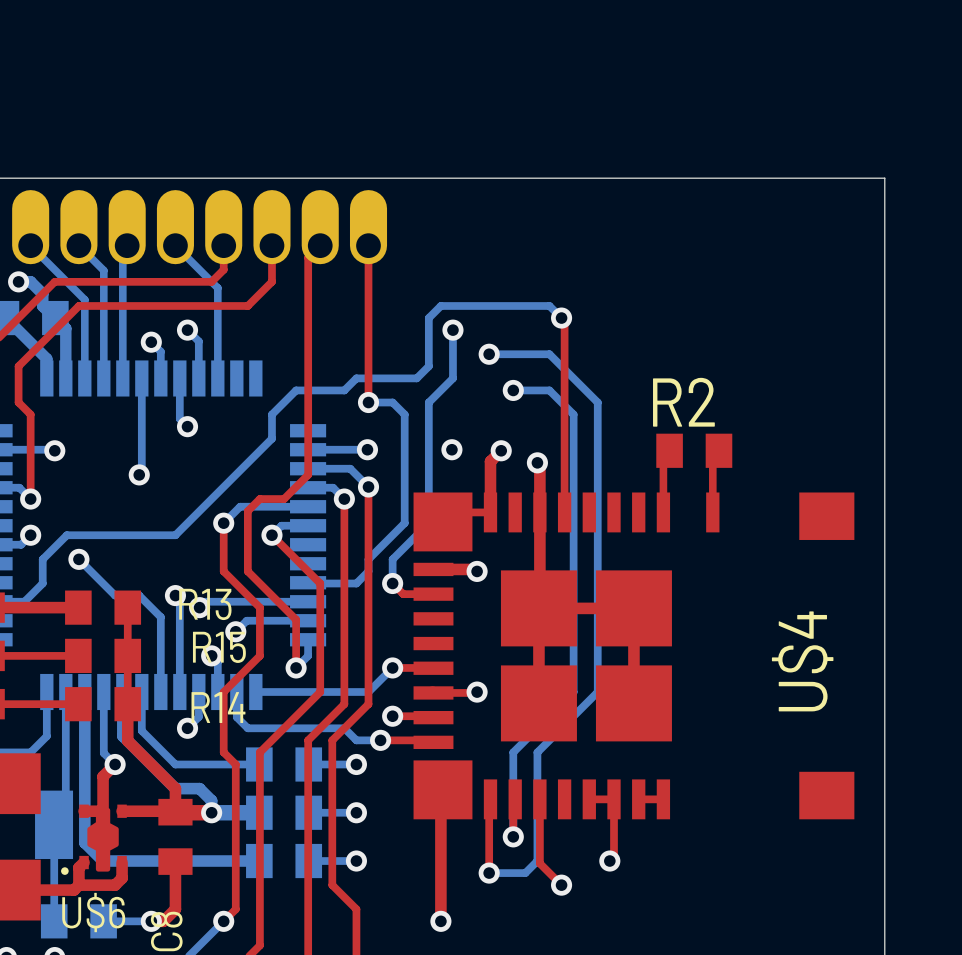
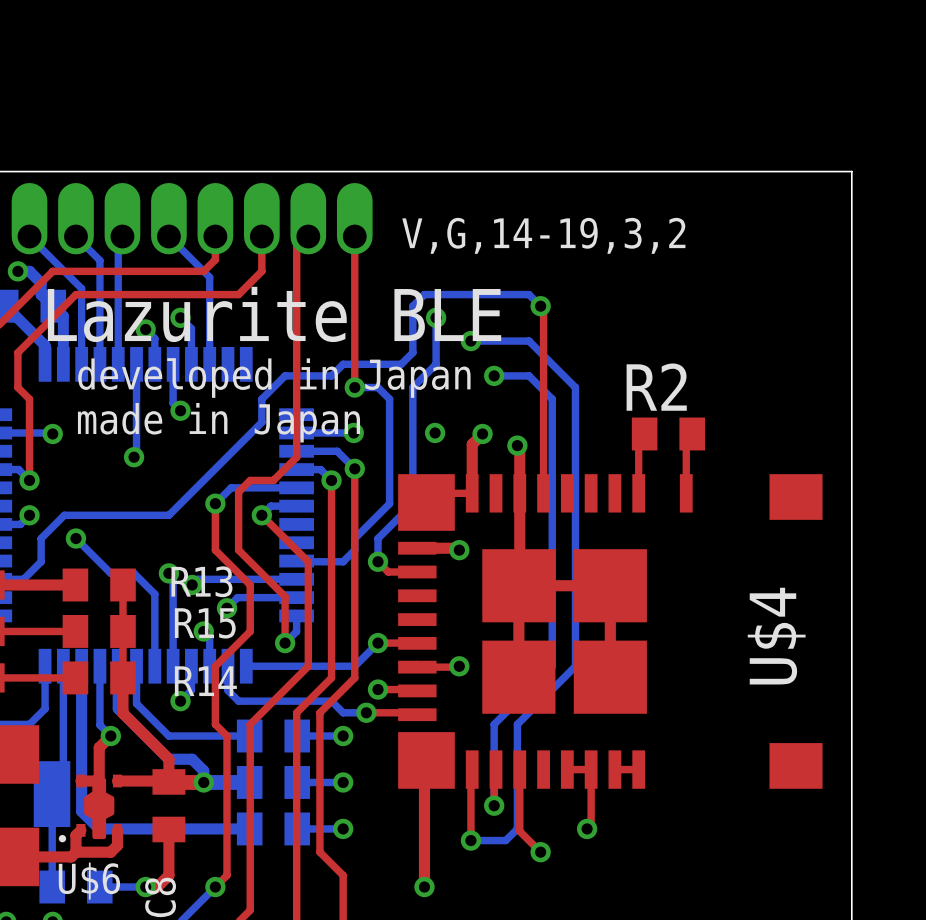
text: none -> V,G,14-19,3,2 (543, 235)
text: none -> Lazurite BLE (274, 314)
text: none -> developed in Japan (274, 378)
text: none -> made in Japan (218, 422)

